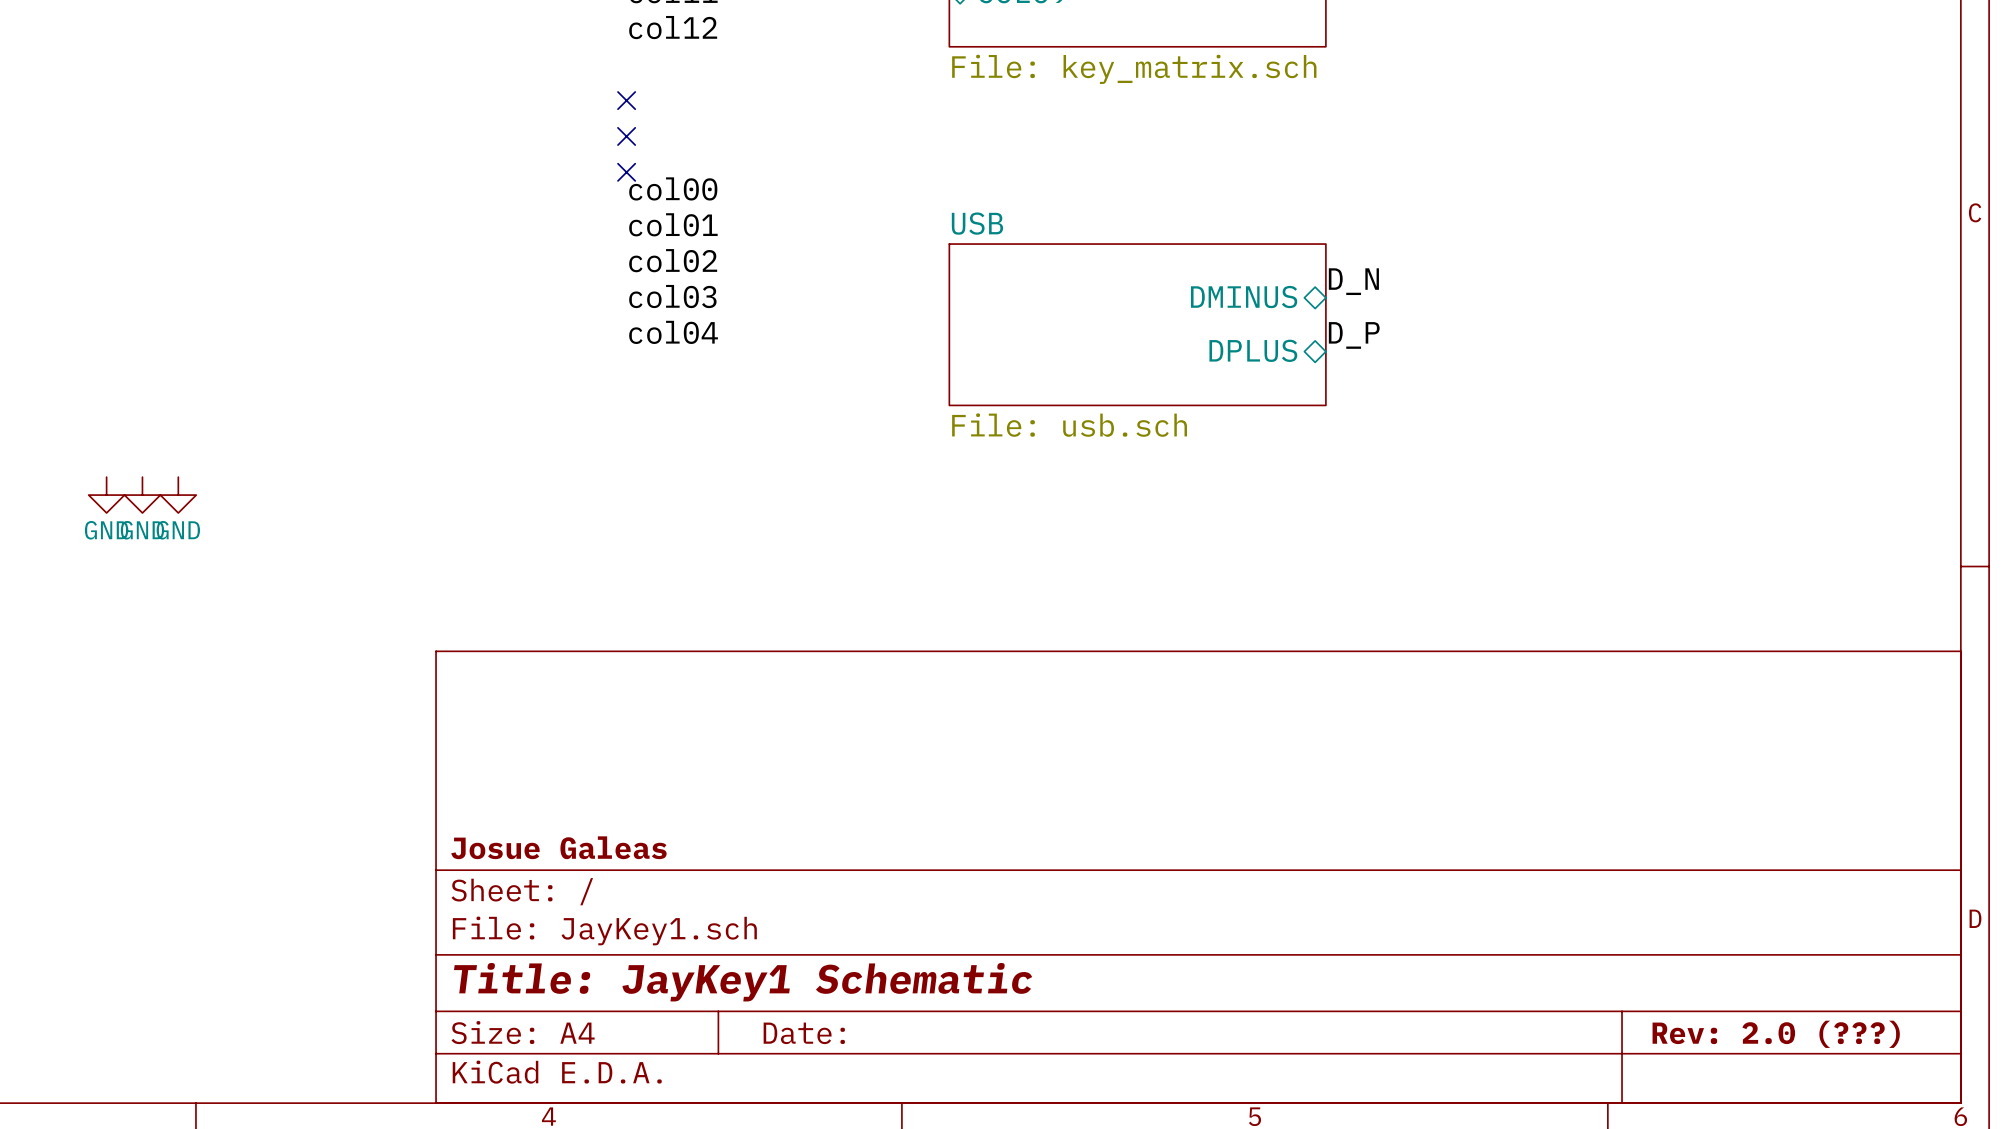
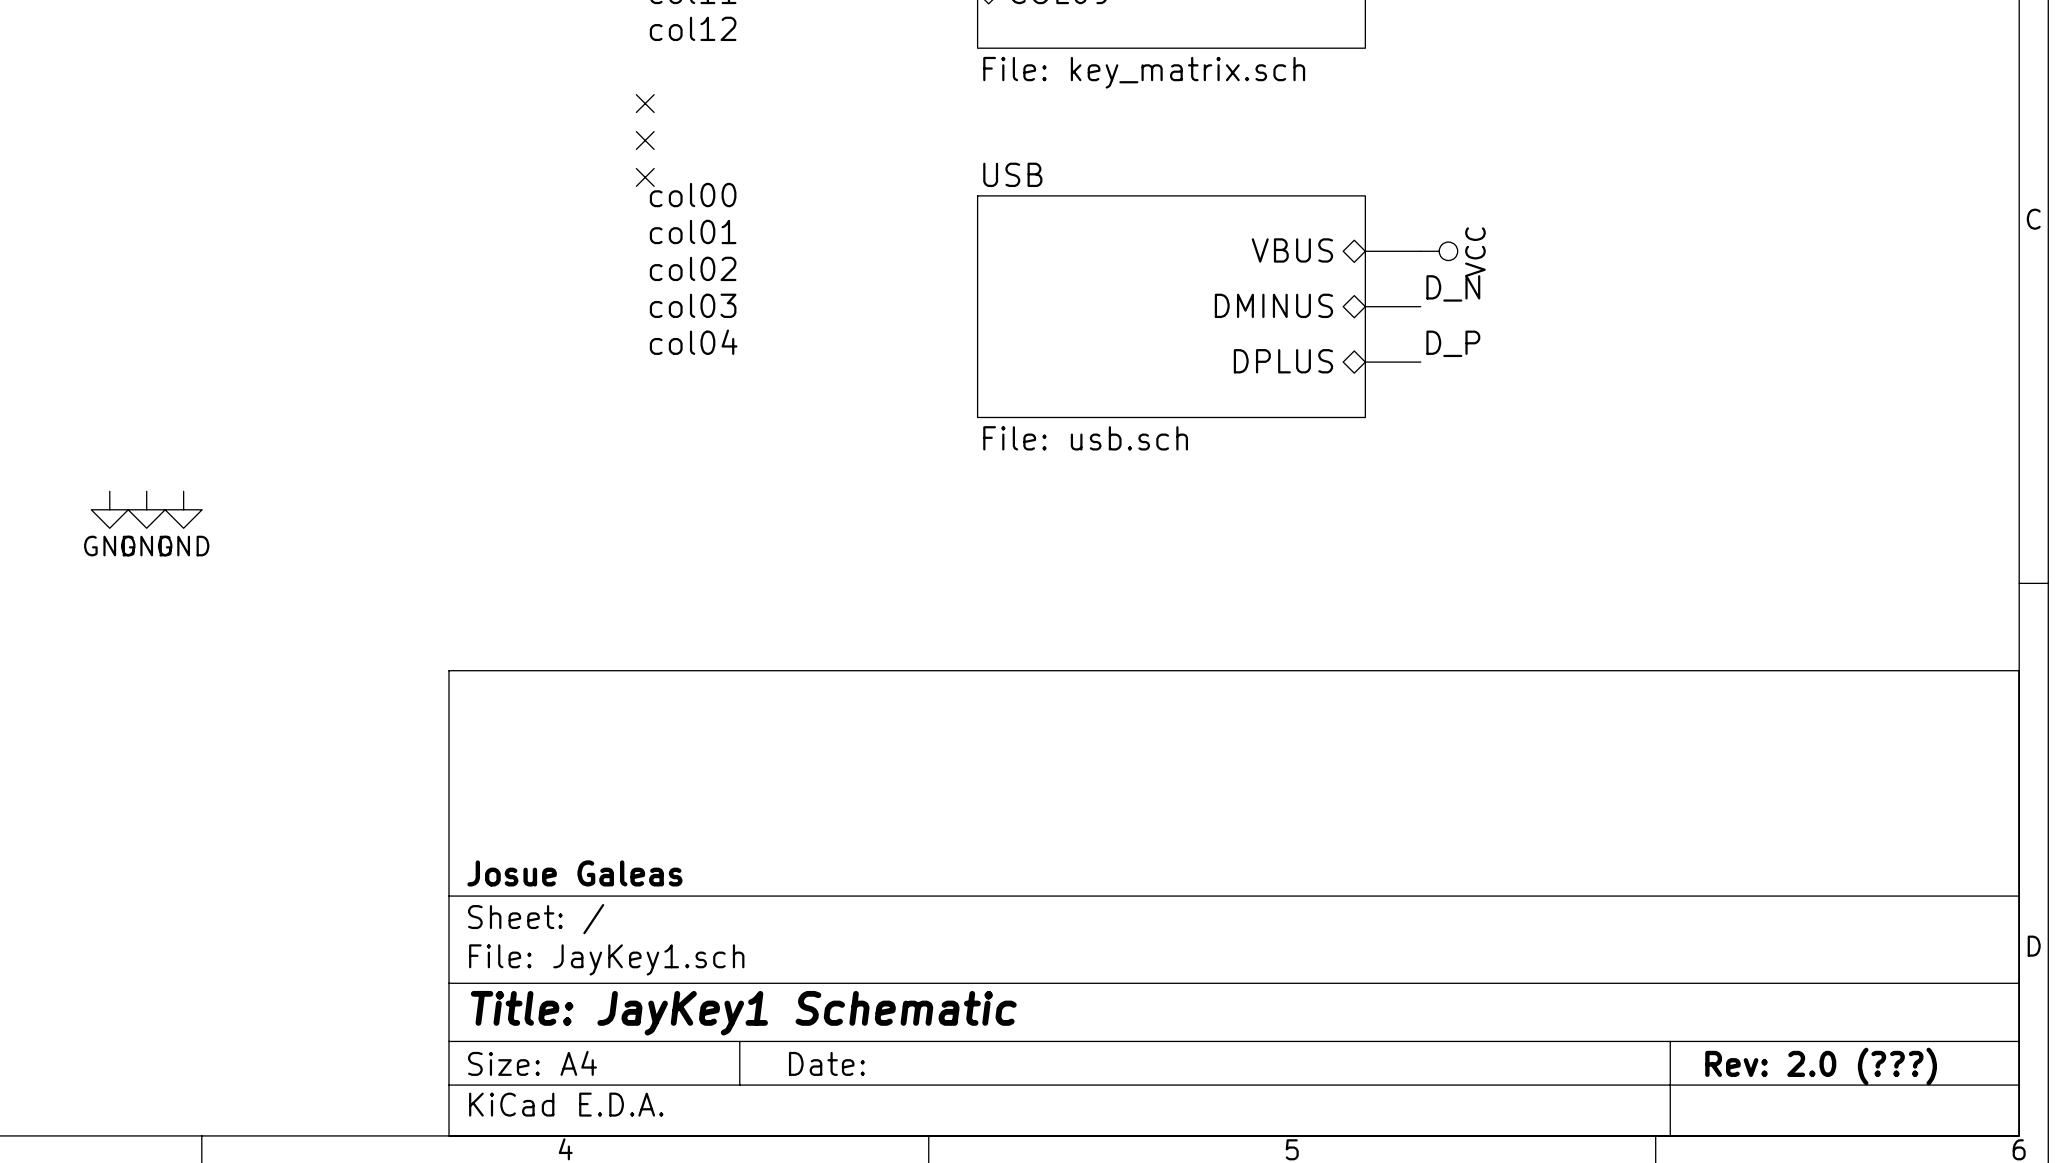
sheet pin: none -> VBUS (1292, 250)
wire: none -> (1365, 251) (1420, 251)
power symbol: none -> VCC (1439, 251)
label position: D_N (1353, 281) -> D_N (1453, 288)
sheet USB: none -> File: usb.sch (1171, 306)
wire: none -> (1365, 306) (1420, 306)
sheet USB: File: usb.sch (1137, 324) -> none
label position: D_P (1354, 335) -> D_P (1453, 343)
wire: none -> (1365, 362) (1420, 362)

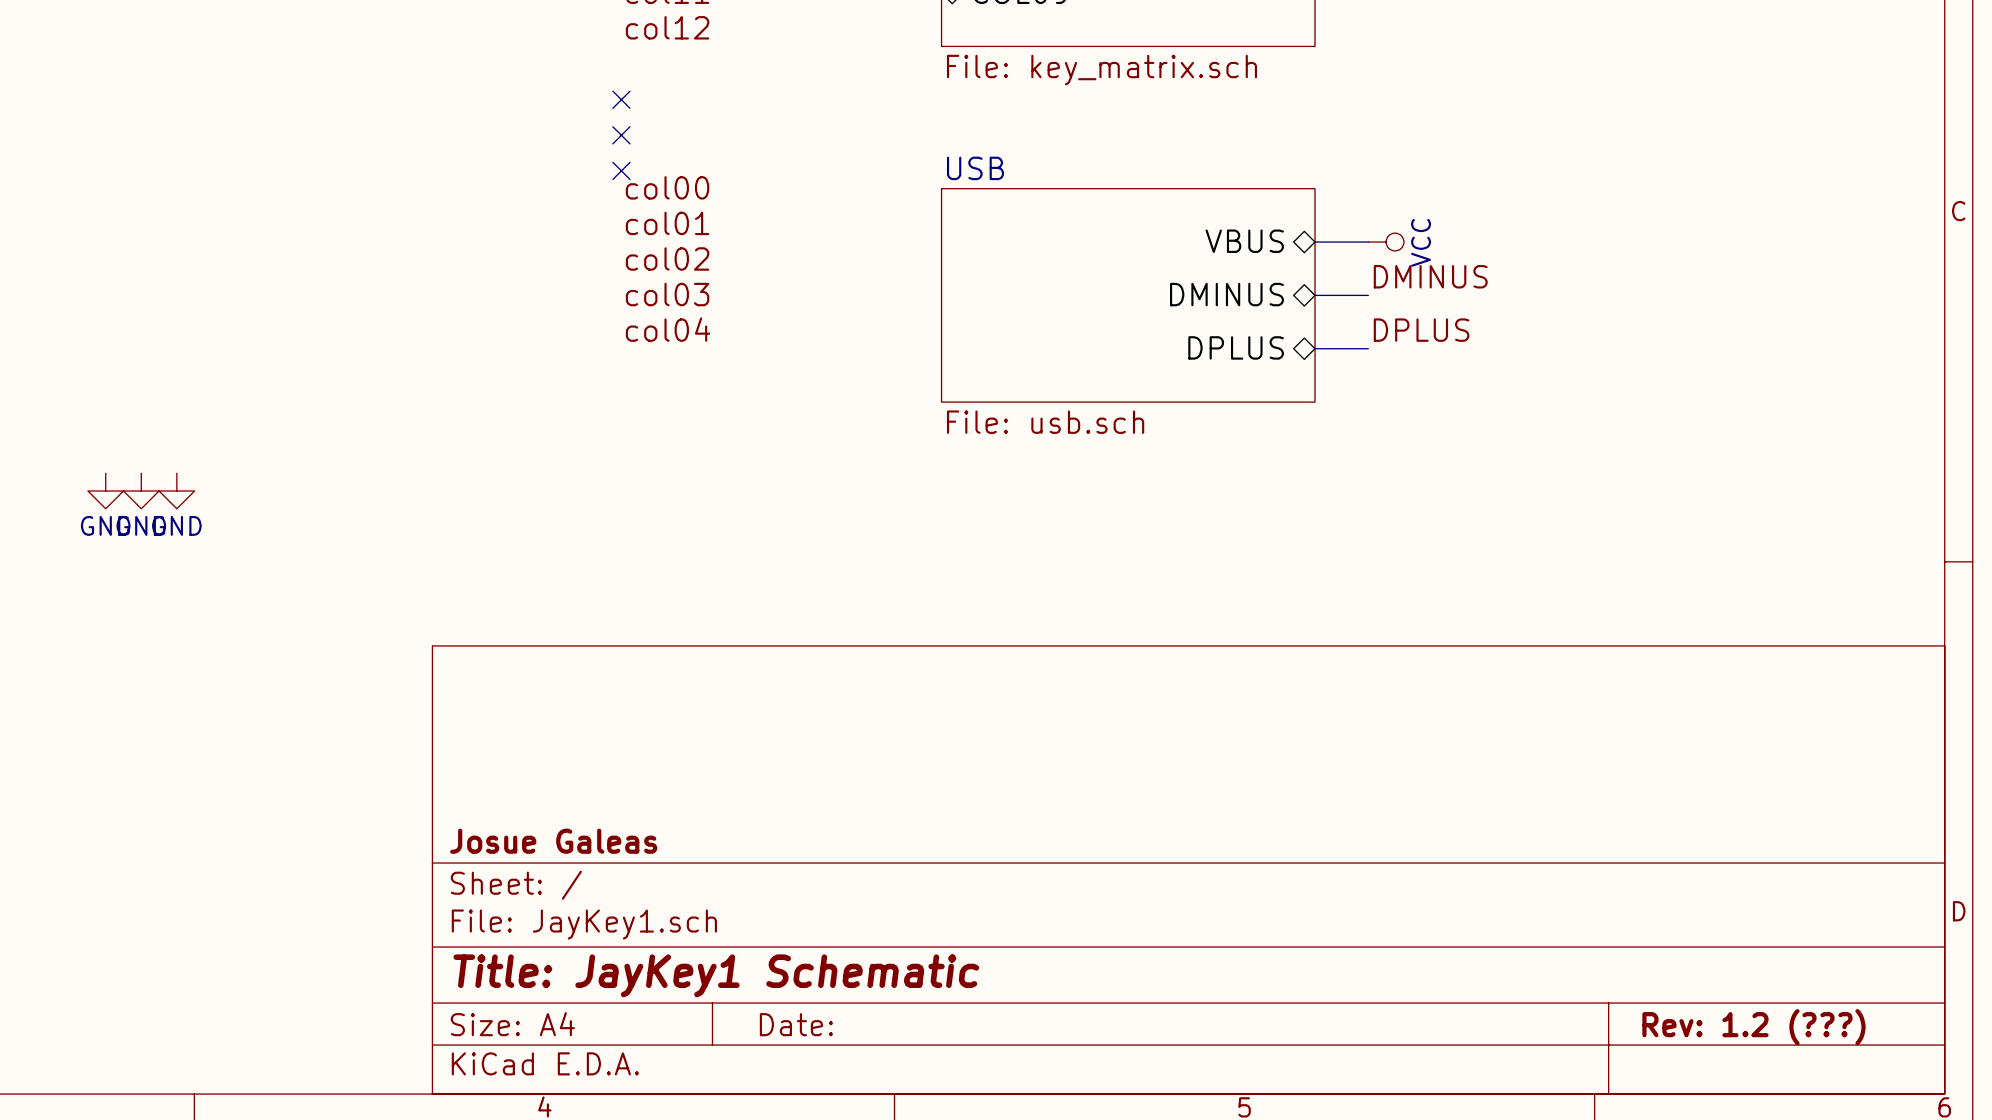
label: D_N (1453, 288) -> DMINUS (1430, 276)
label: D_P (1453, 343) -> DPLUS (1421, 330)
title block: Rev: 2.0 (???) (1821, 1066) -> Rev: 1.2 (???) (1753, 1027)

